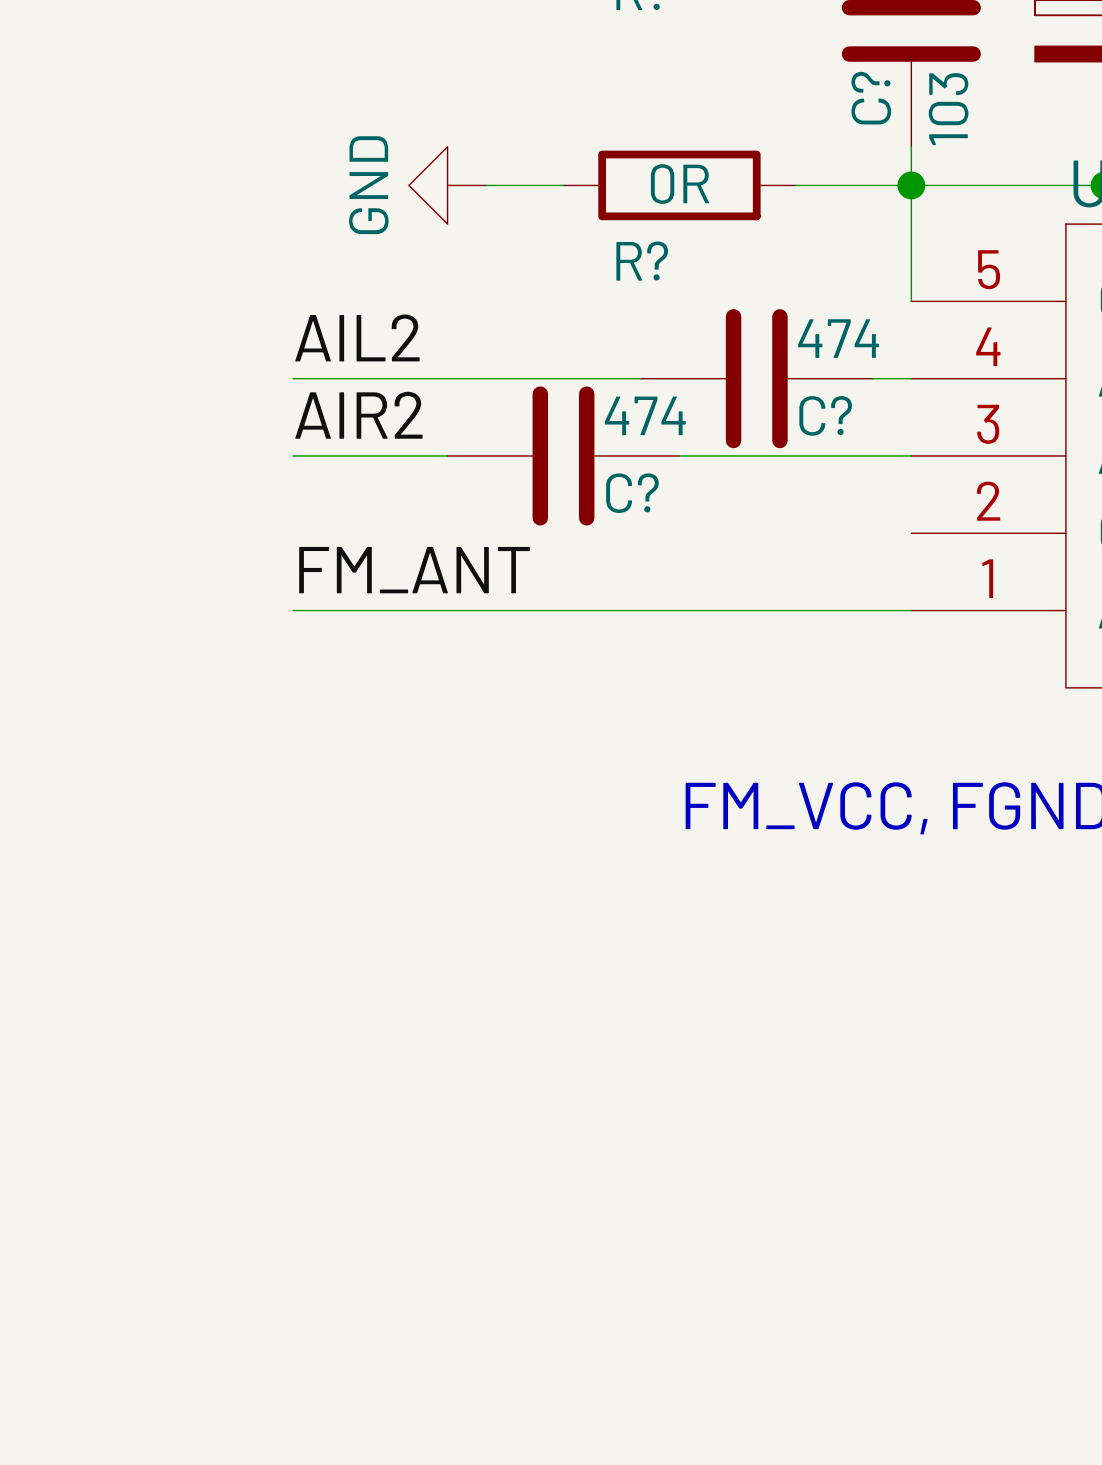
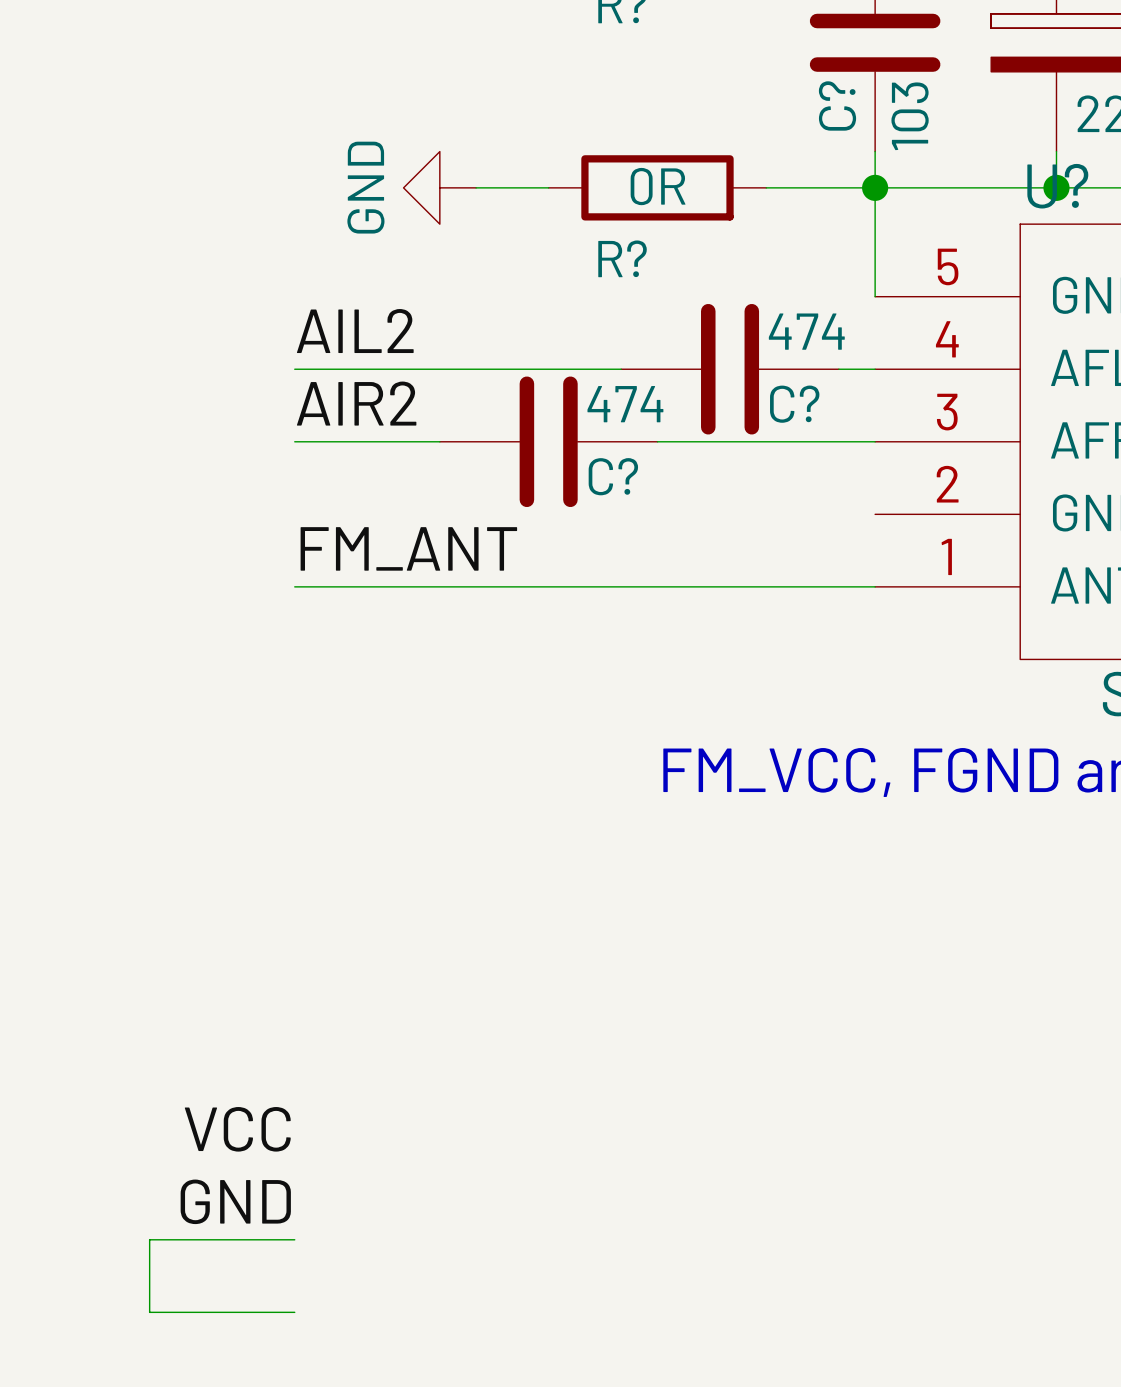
label: none -> VCC (237, 1129)
label: none -> GND (235, 1201)
wire: none -> (294, 1239) (149, 1239) (149, 1312) (294, 1312)

